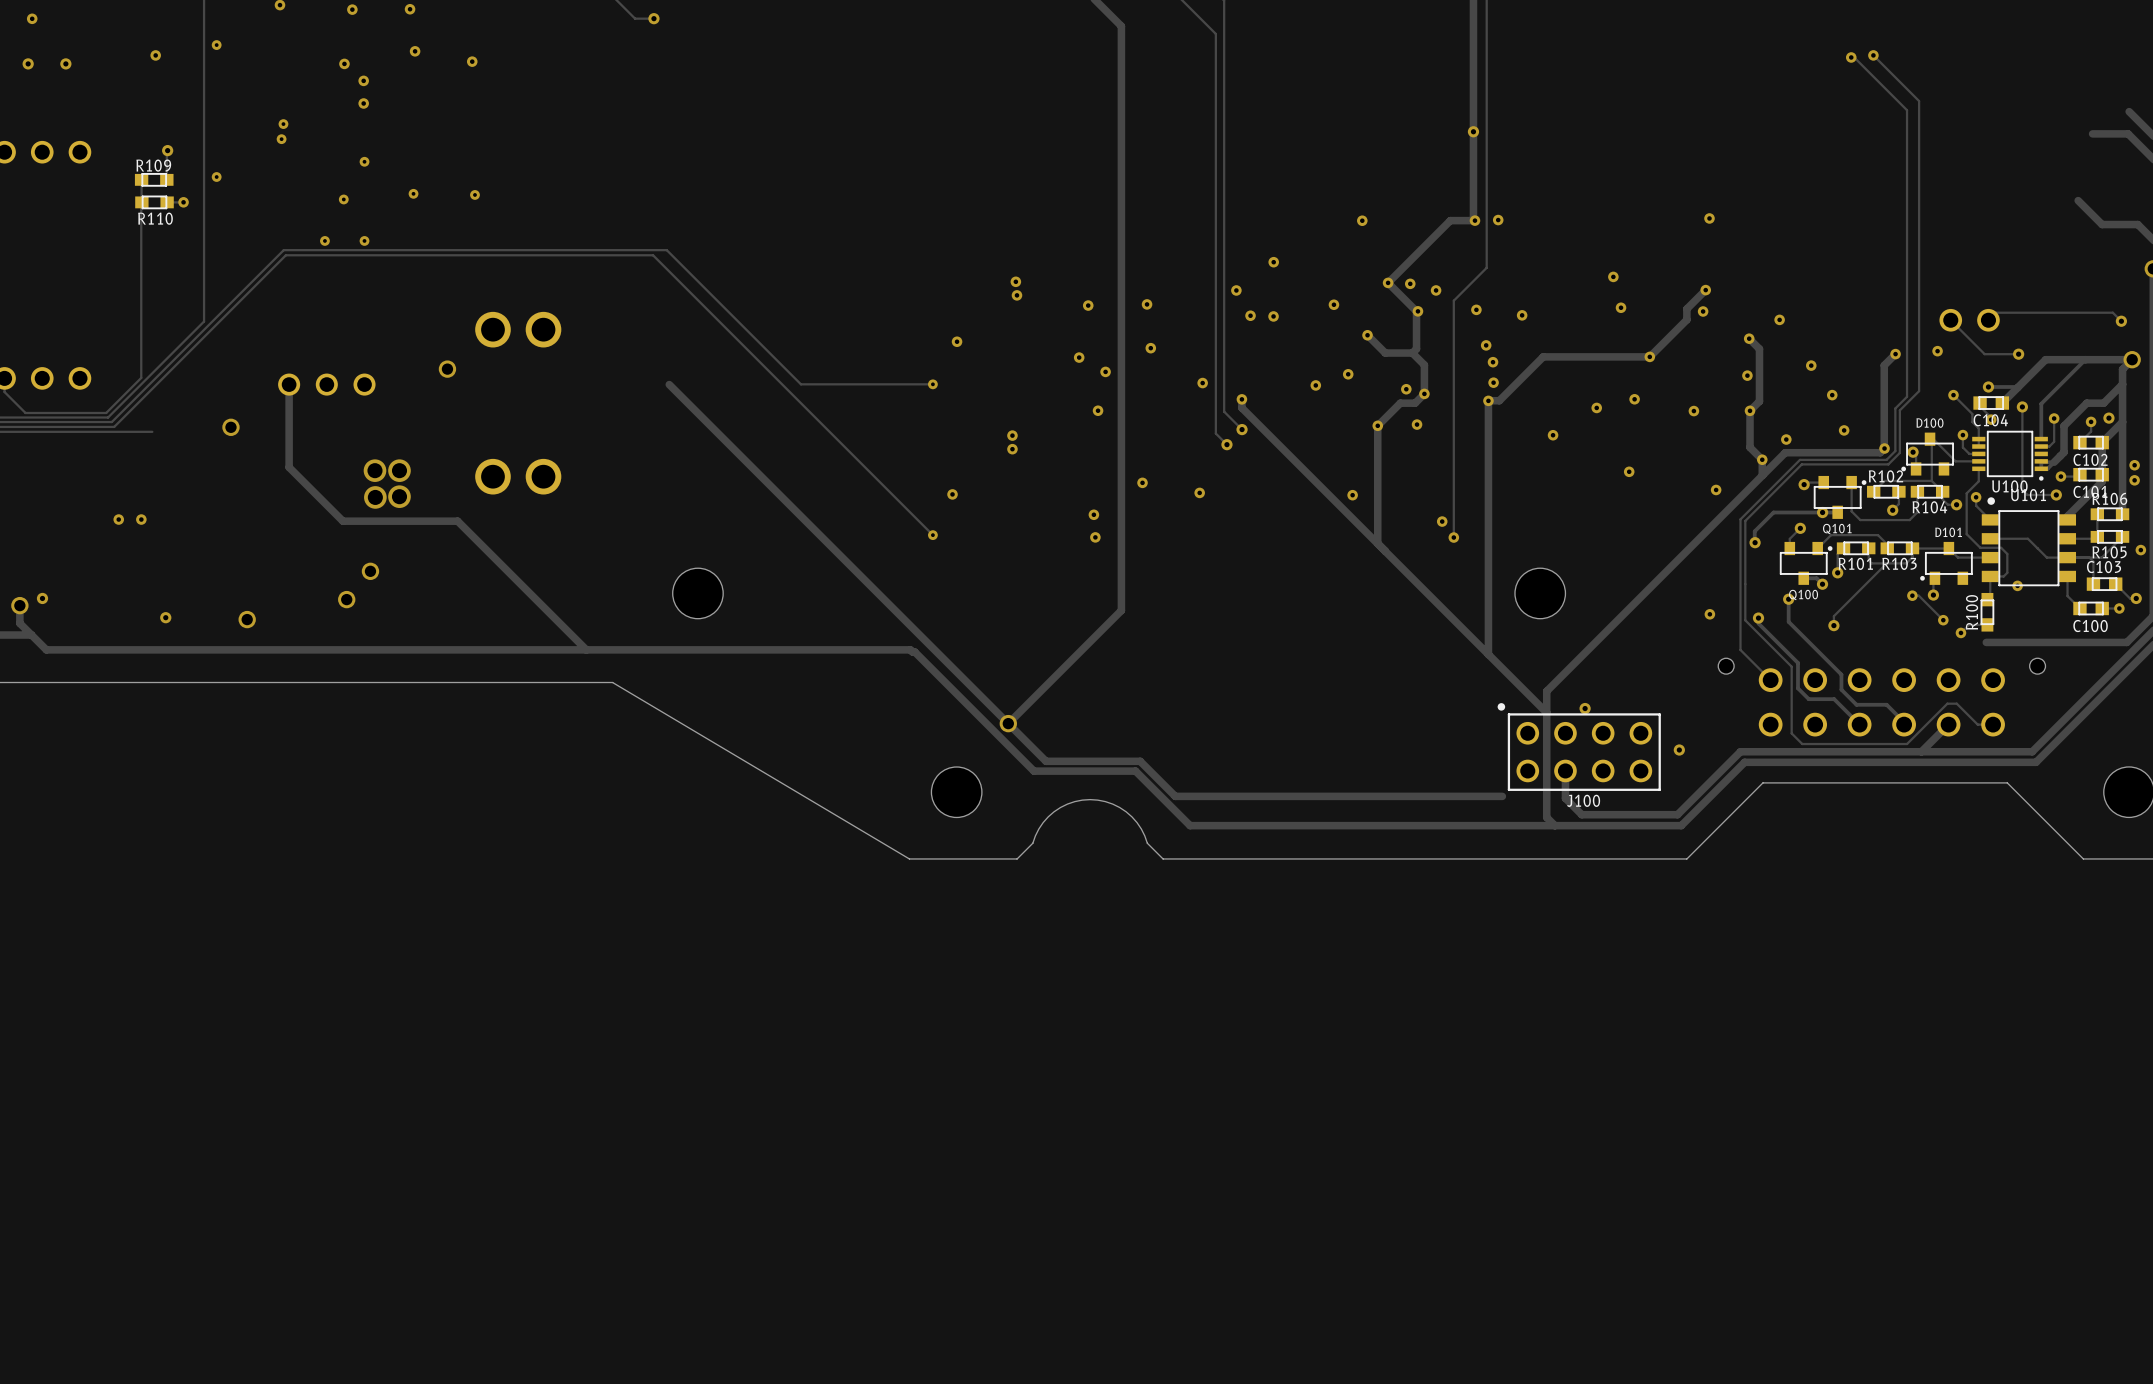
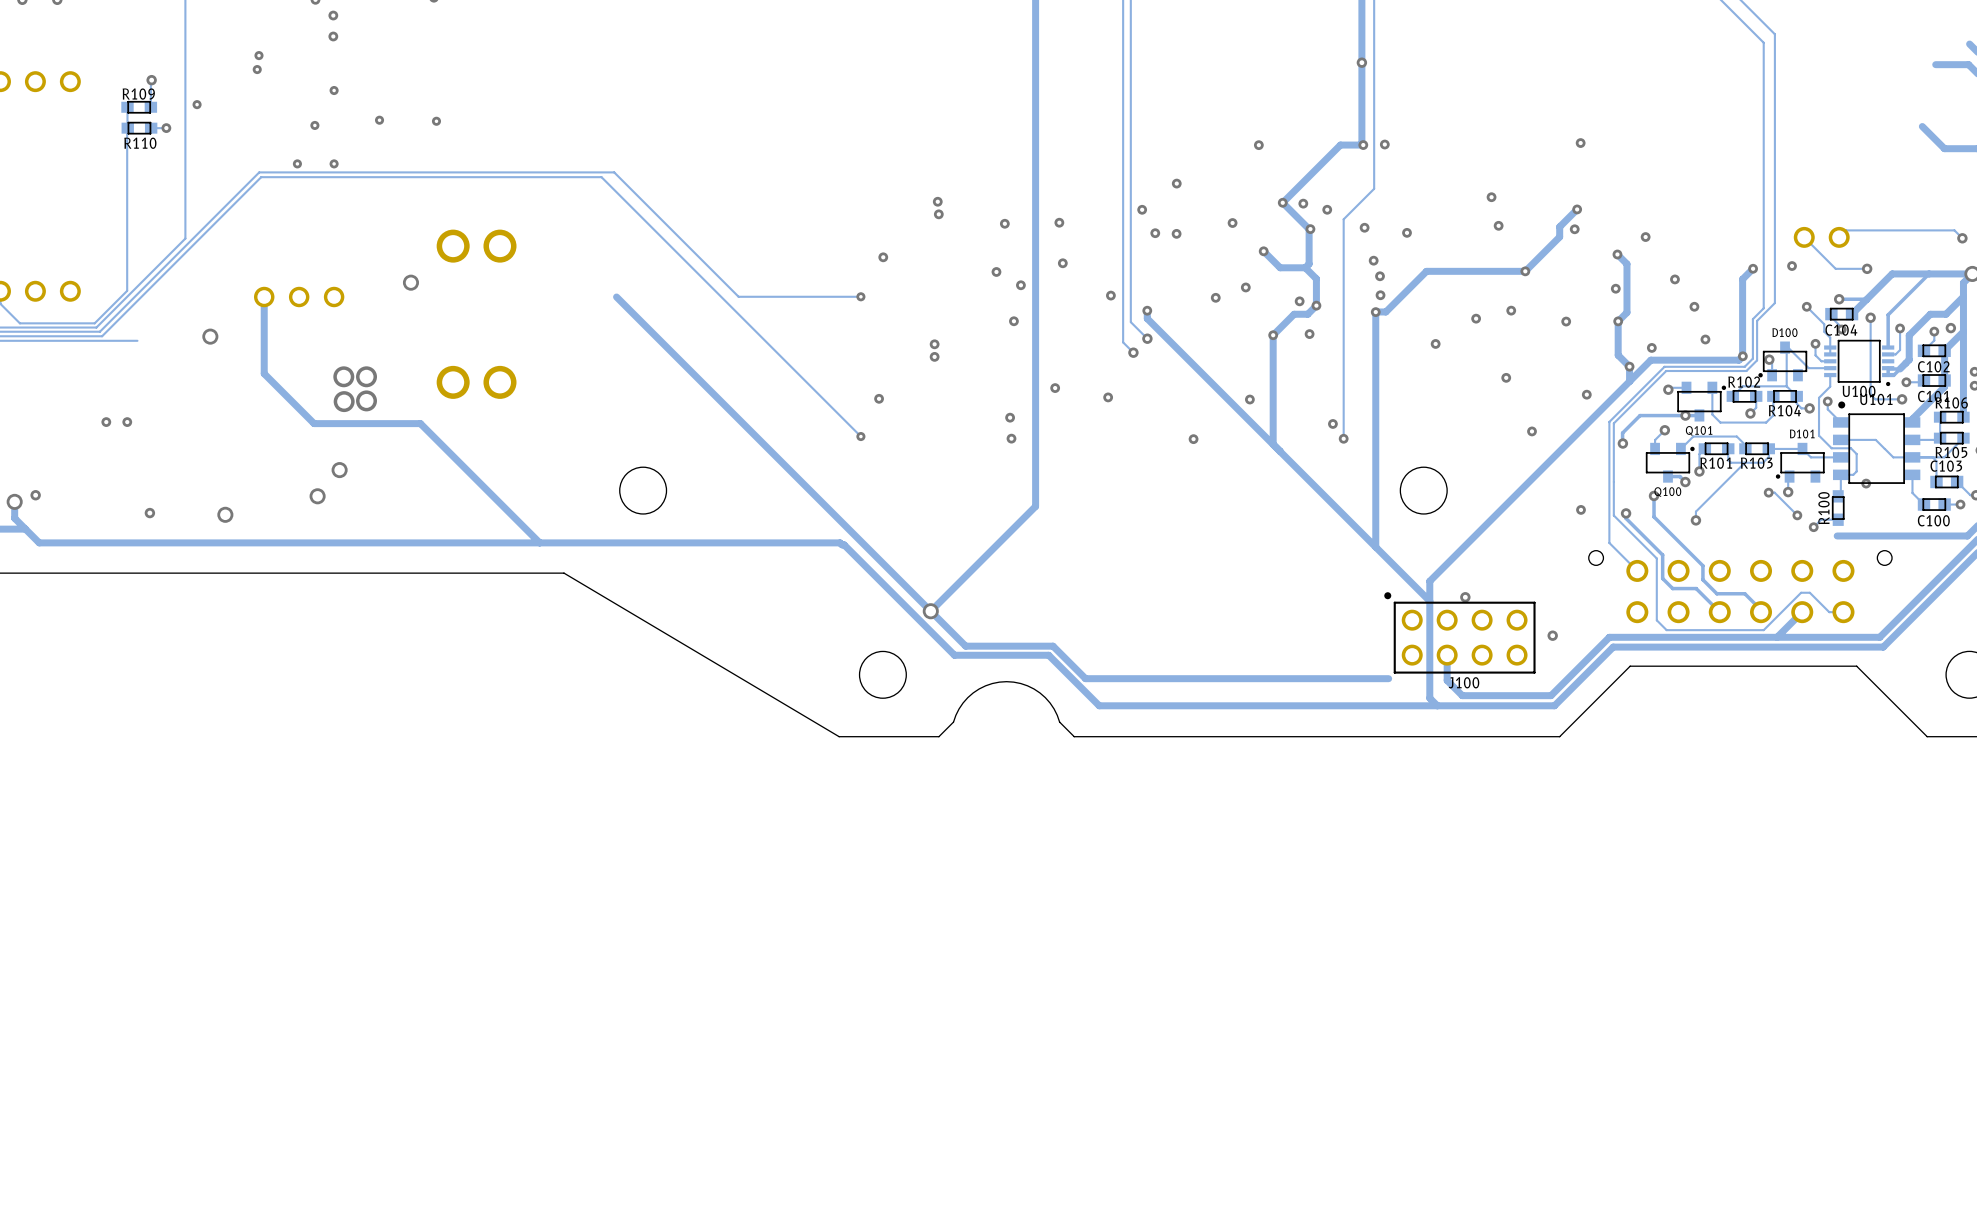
via: none -> (1532, 431)
via: none -> (1193, 439)

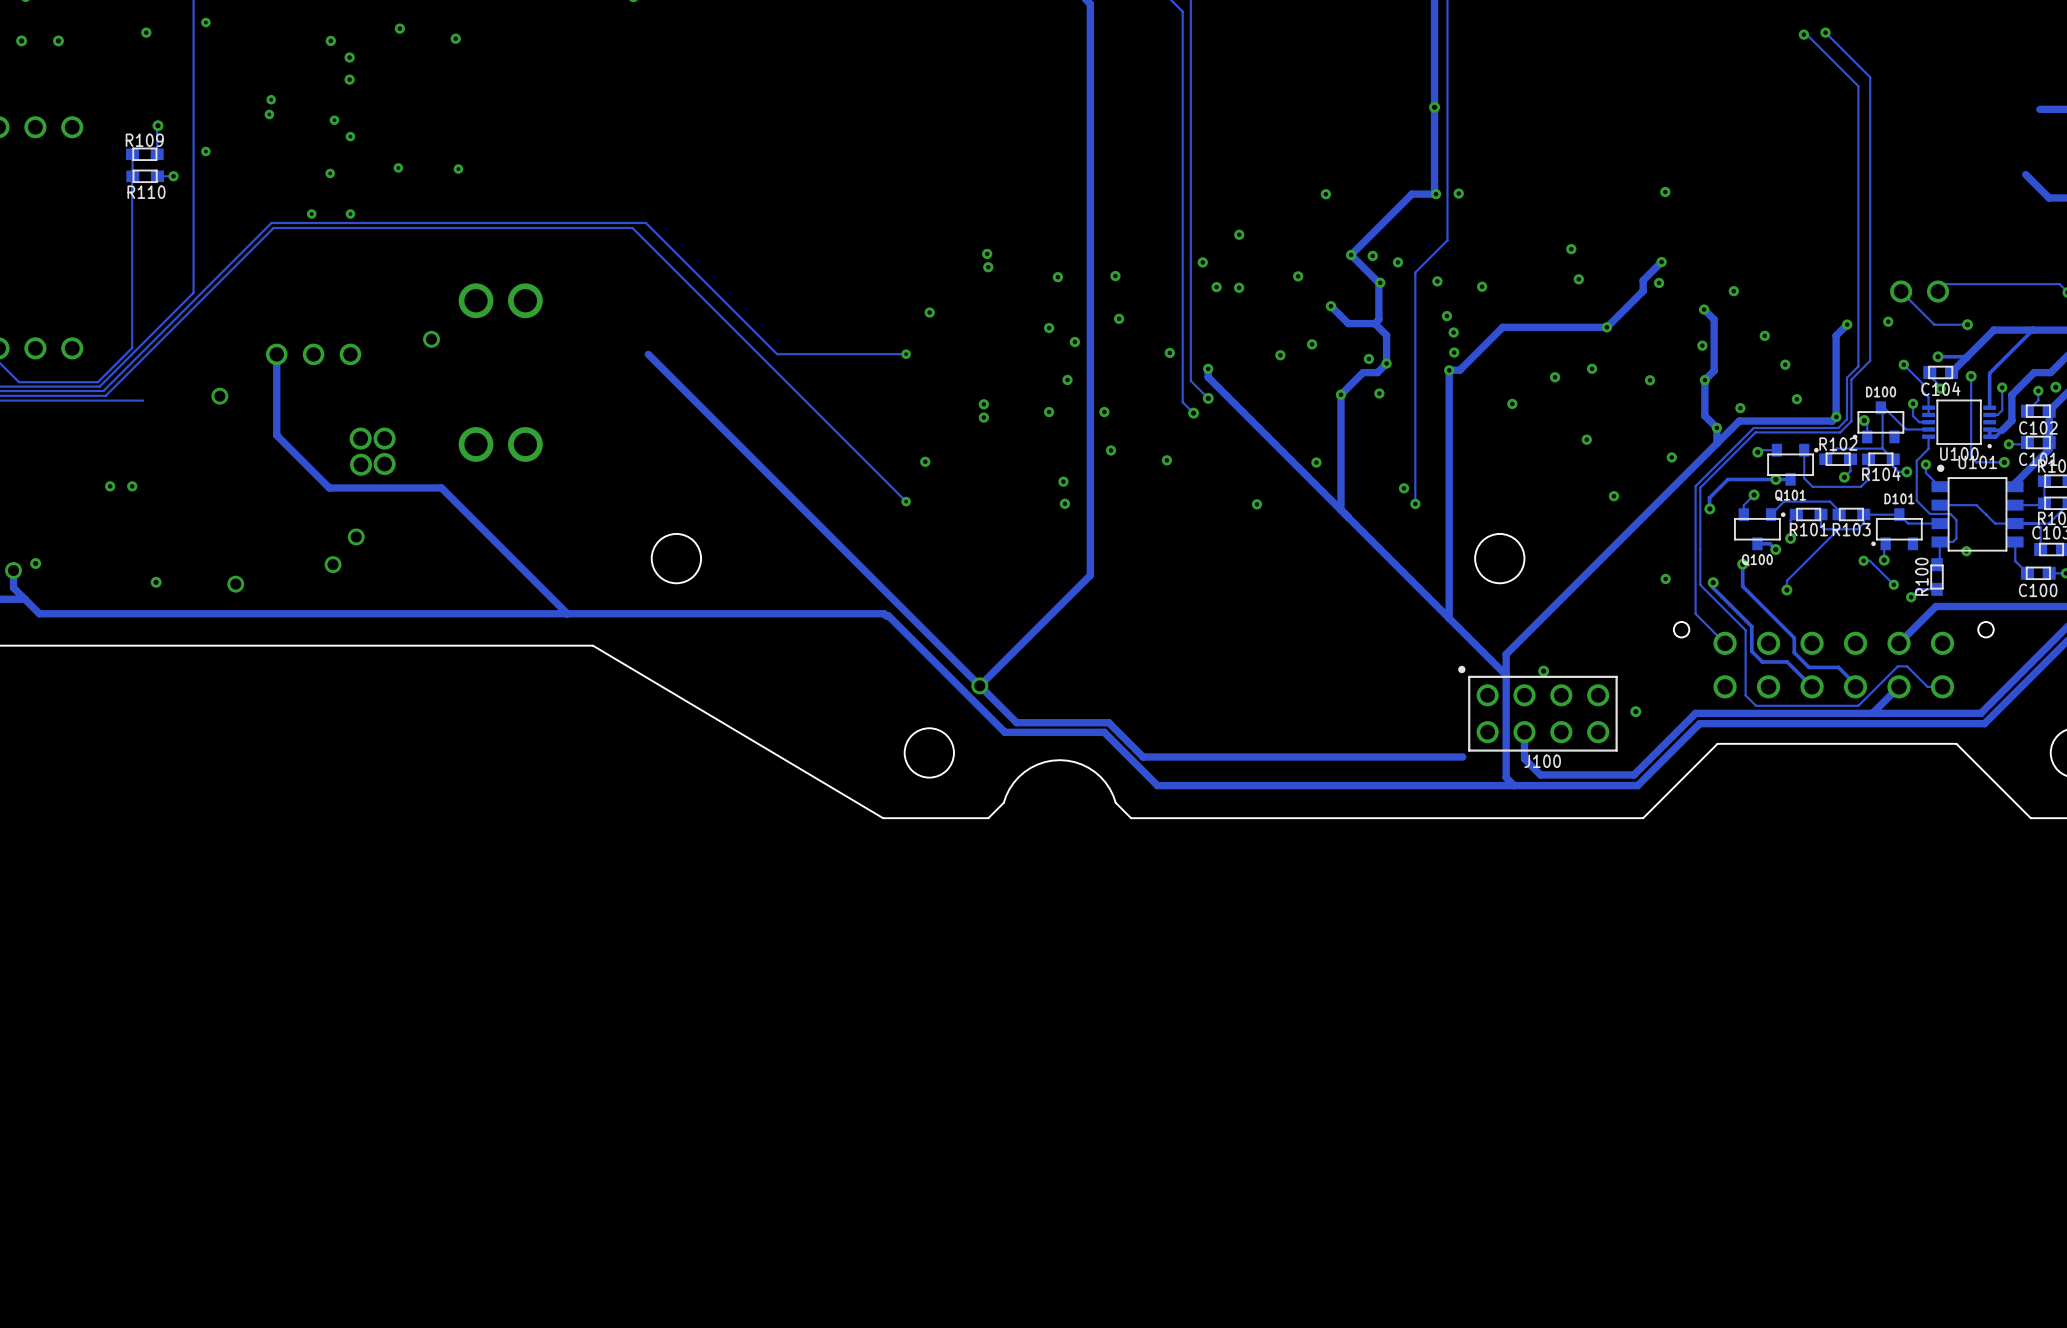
via: none -> (334, 120)
via: none -> (1049, 412)
via: none -> (1104, 412)
track: none -> (1935, 606) (1899, 643)

